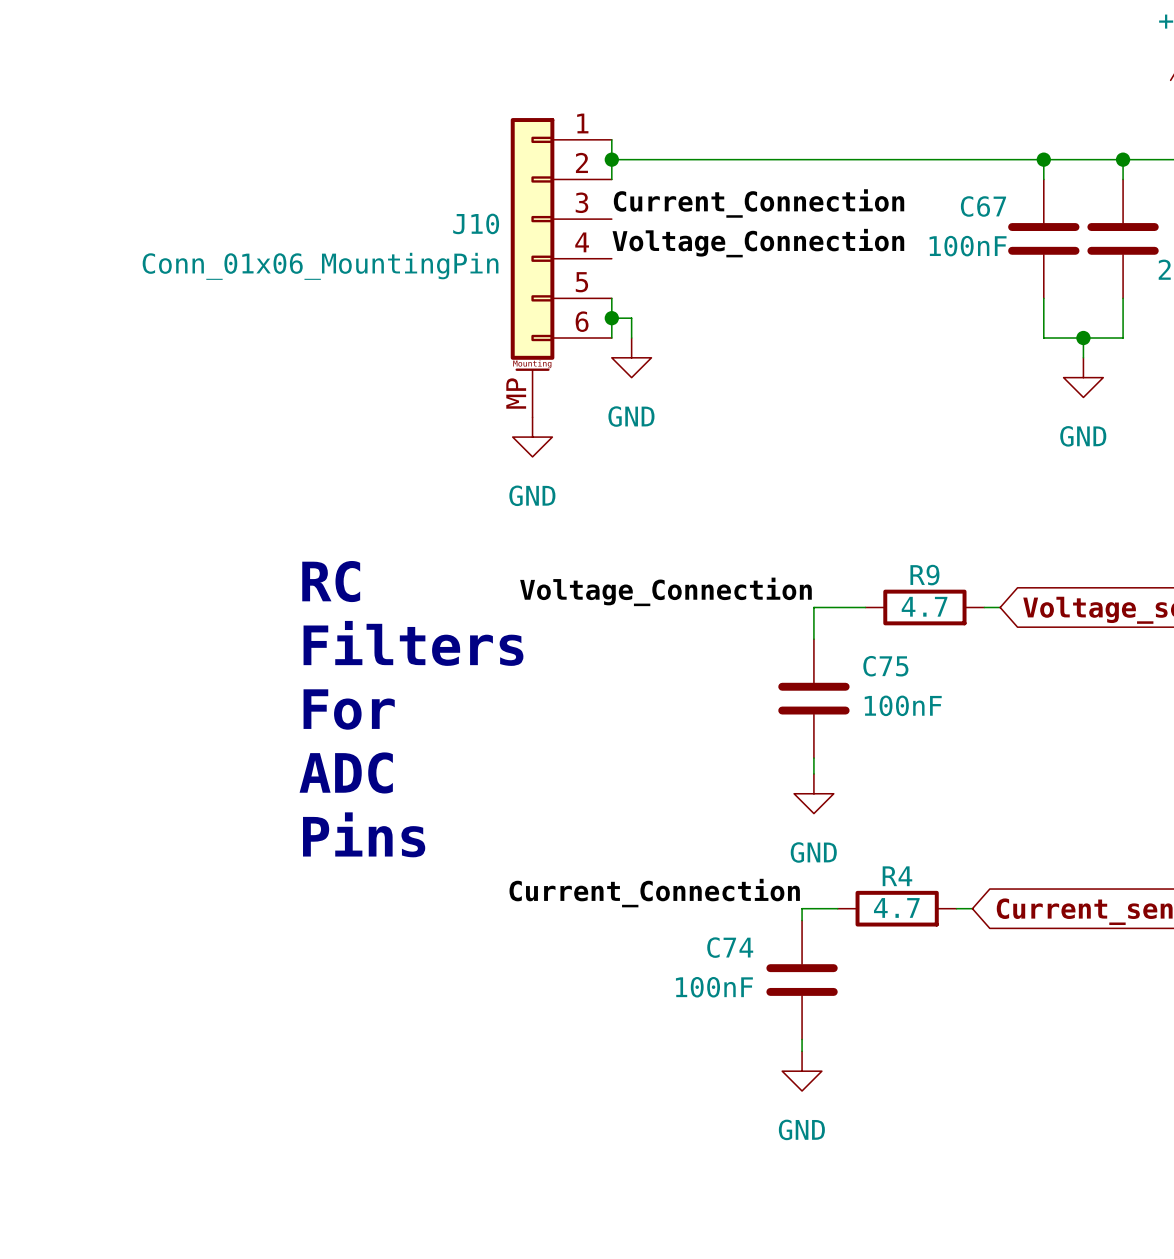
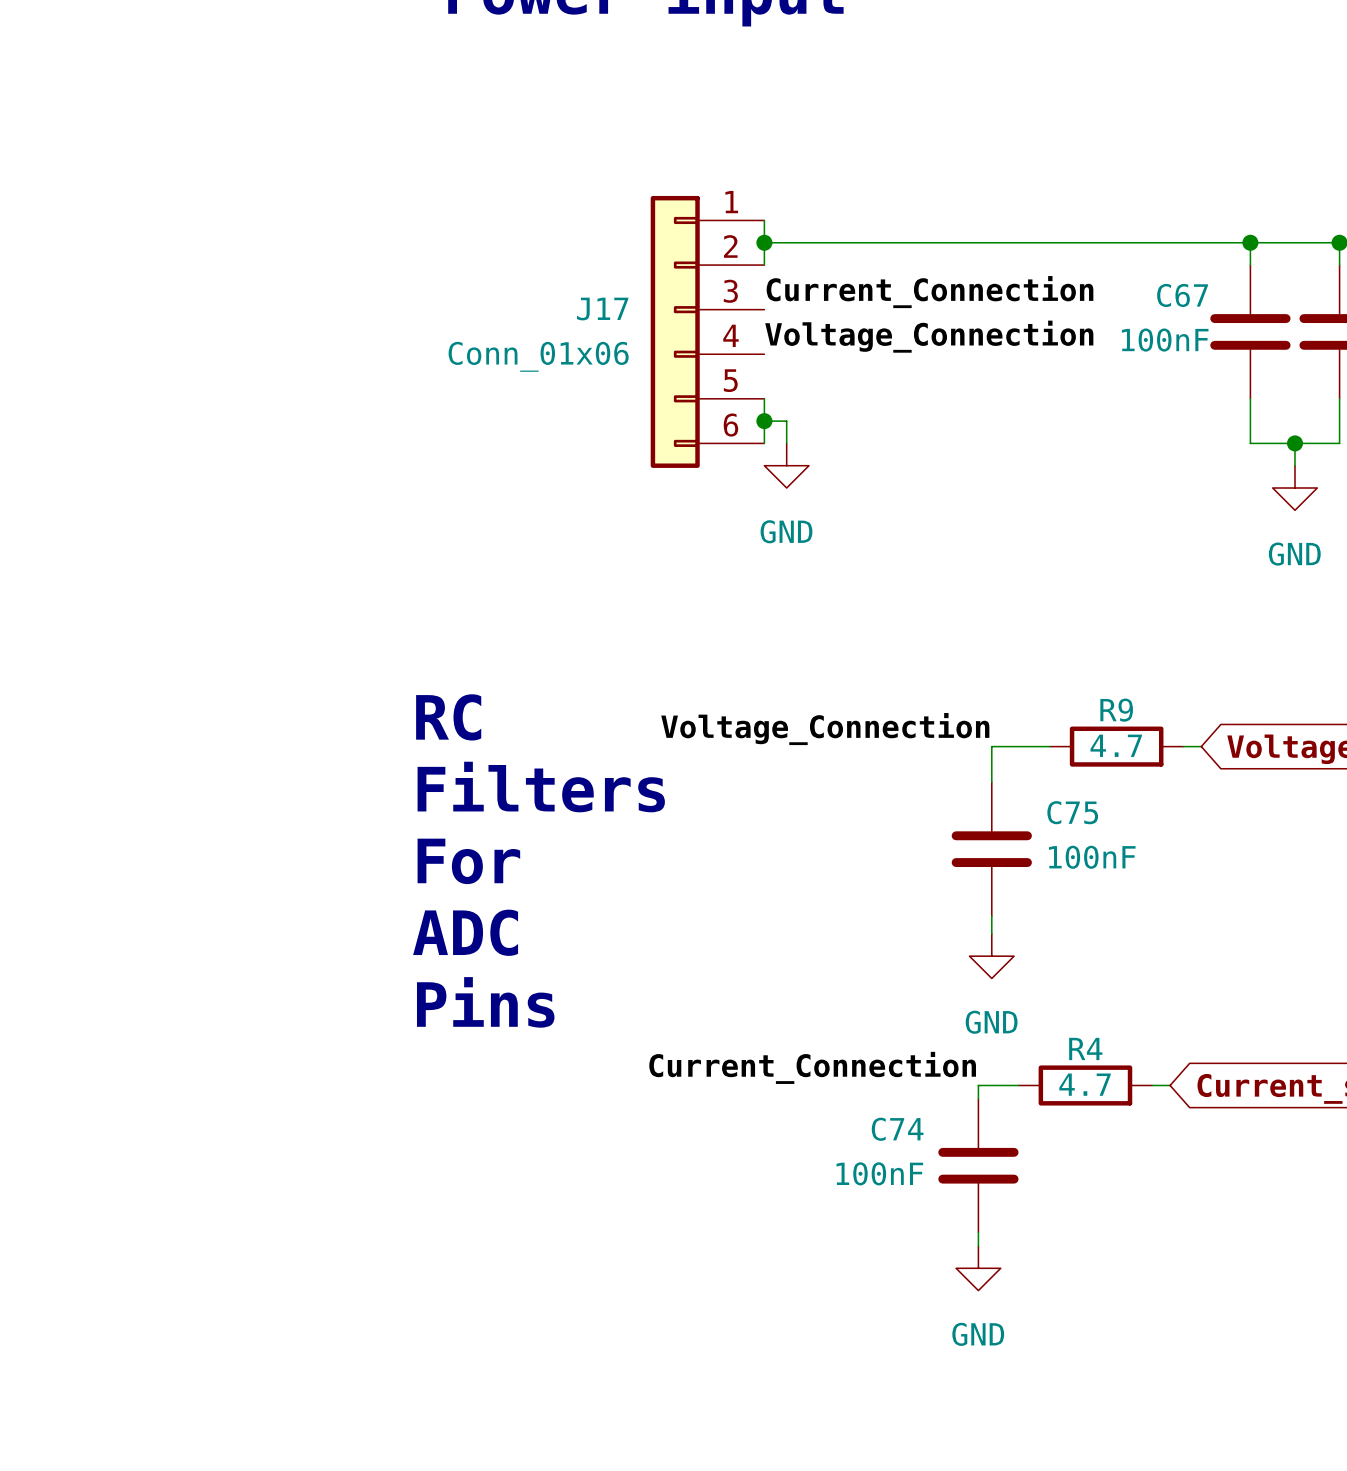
J17: none -> Conn_01x06 (707, 331)
J10: Conn_01x06_MountingPin (561, 267) -> none
power symbol: GND (532, 437) -> none

